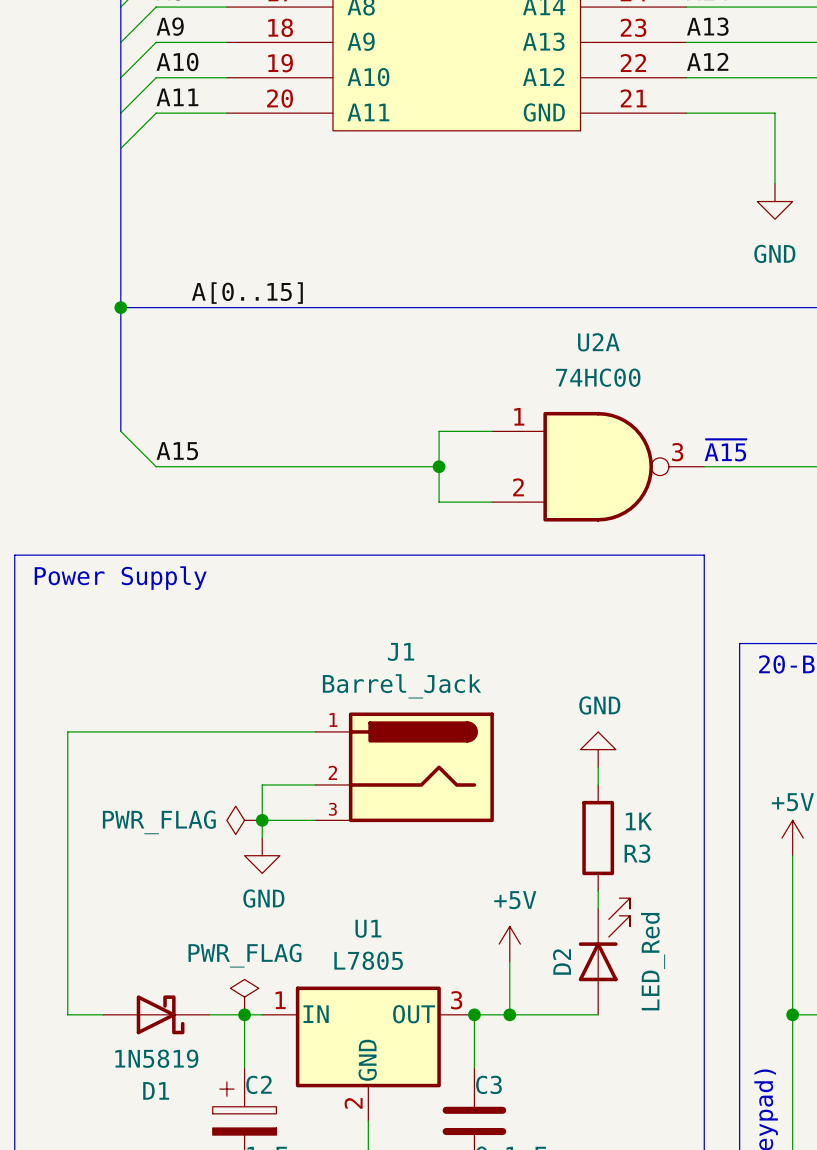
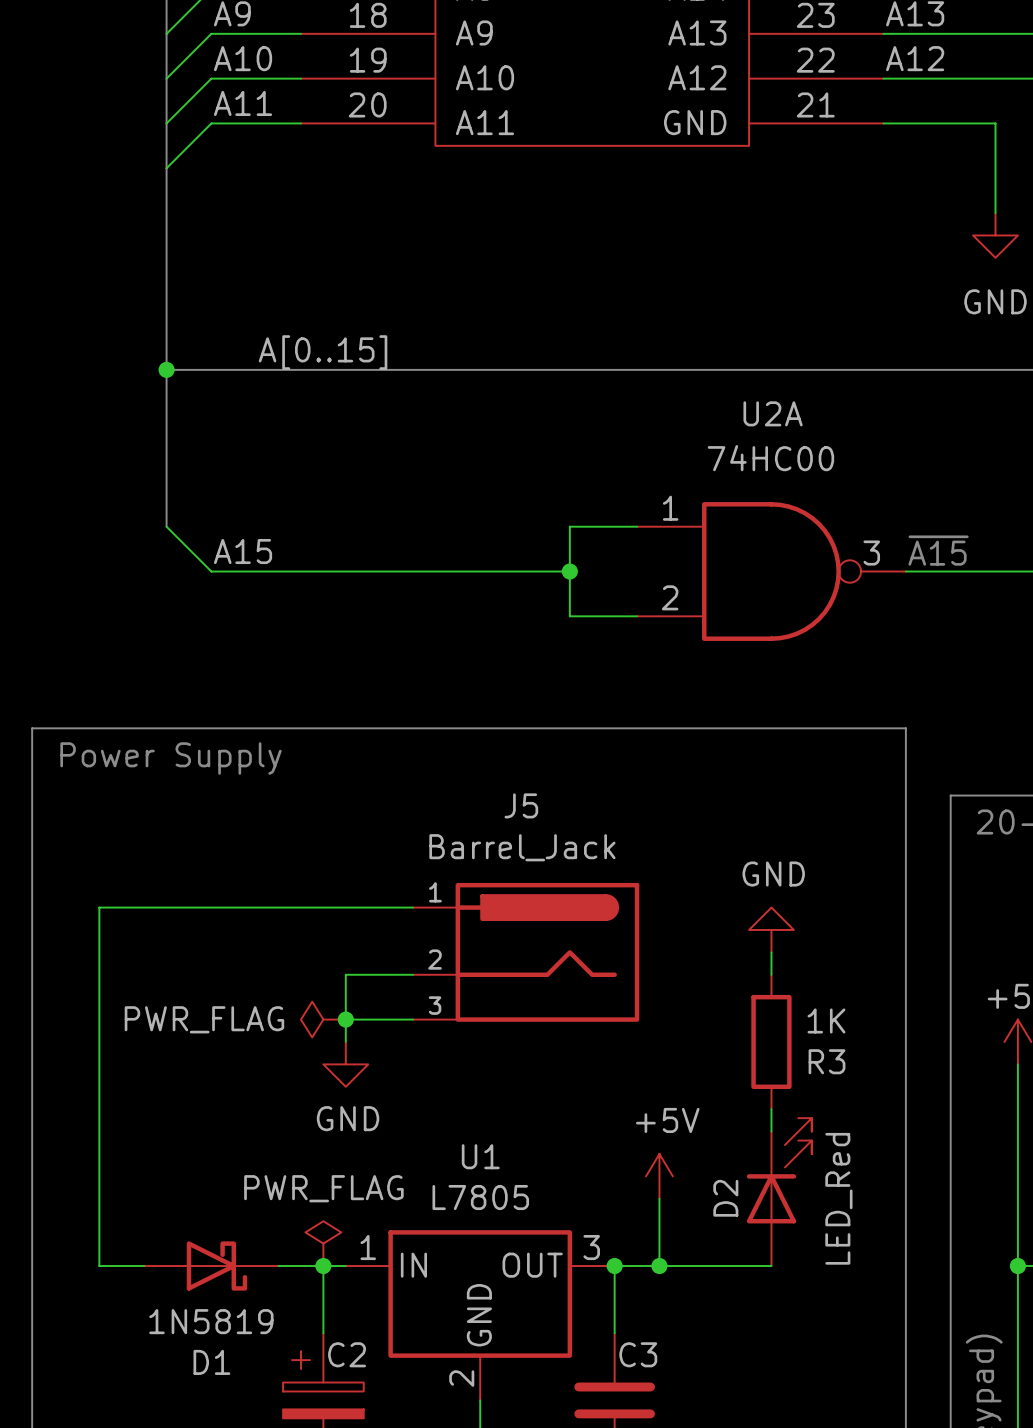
text position: Power Supply (120, 578) -> Power Supply (171, 758)
line: (14, 590) (14, 555) (704, 555) (704, 590) -> (32, 728) (905, 728)
J1 name: J1 (401, 651) -> J5 (521, 805)

